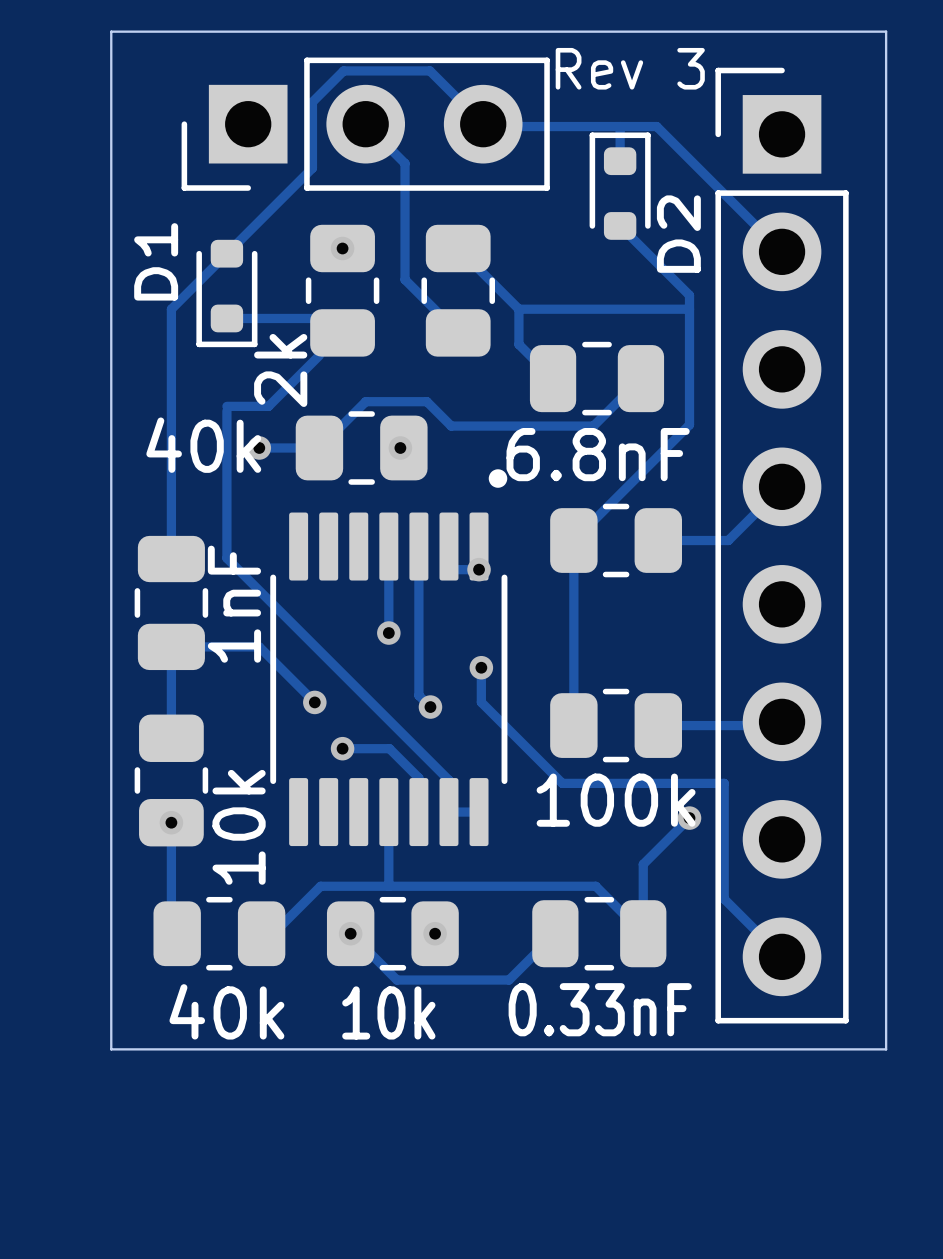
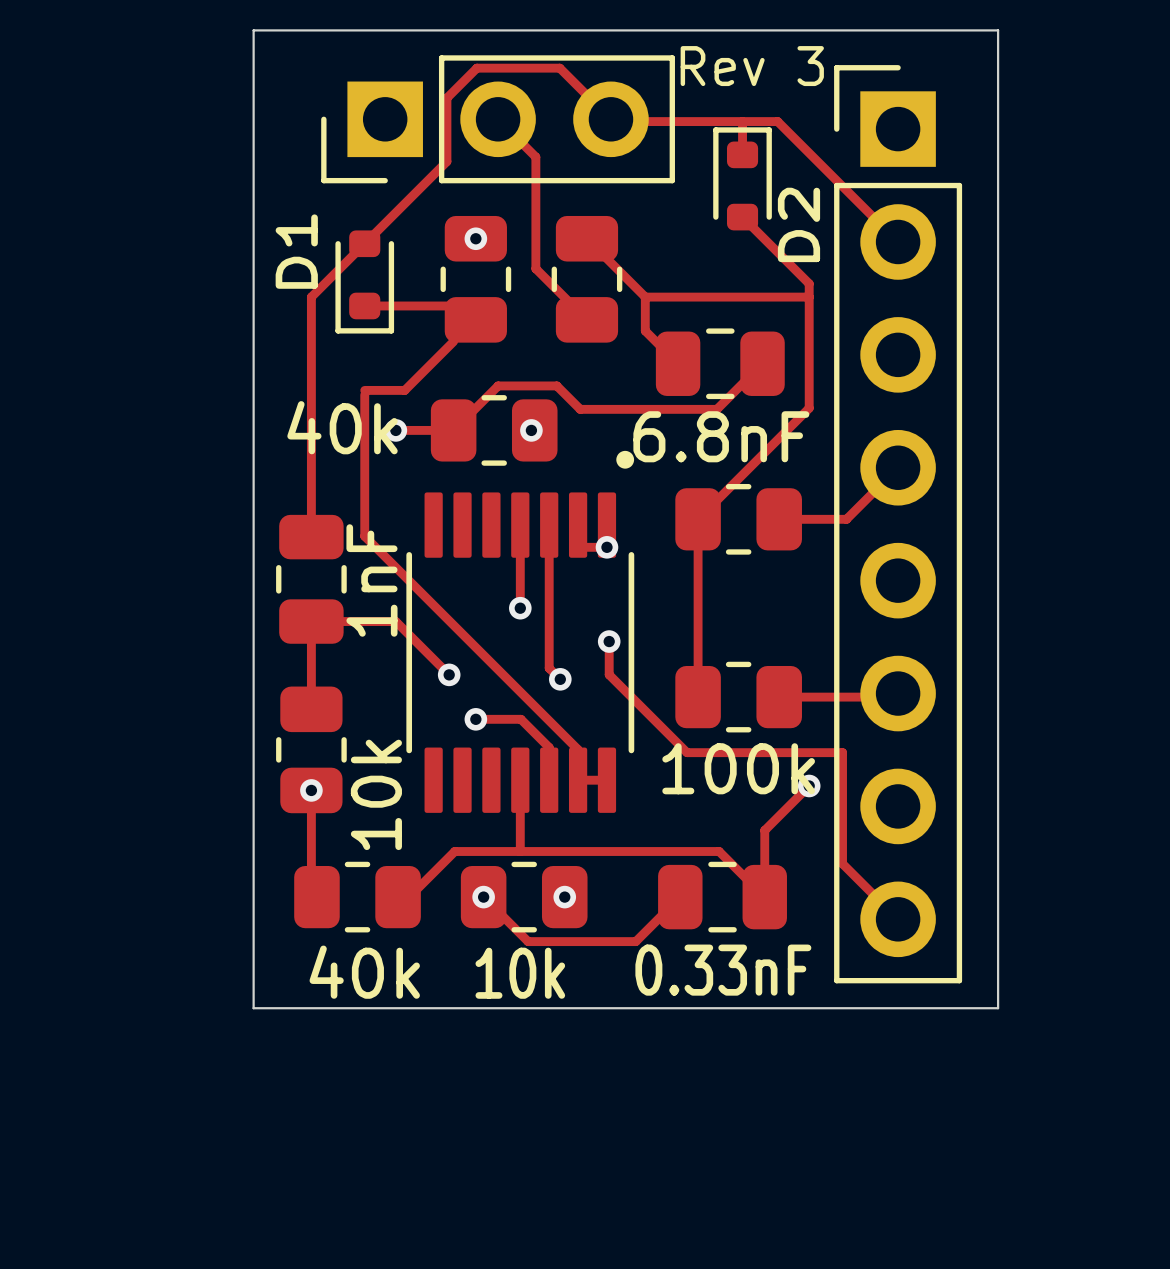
part value: 2k (280, 370) -> none

